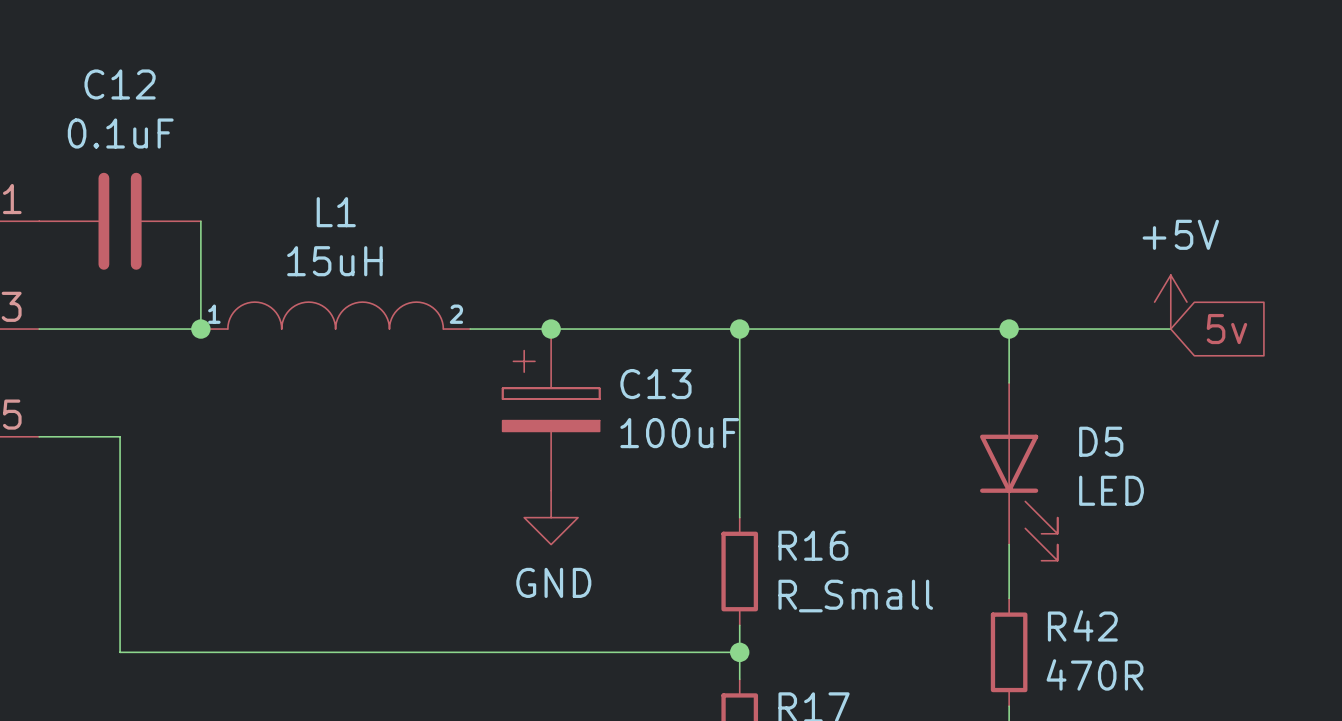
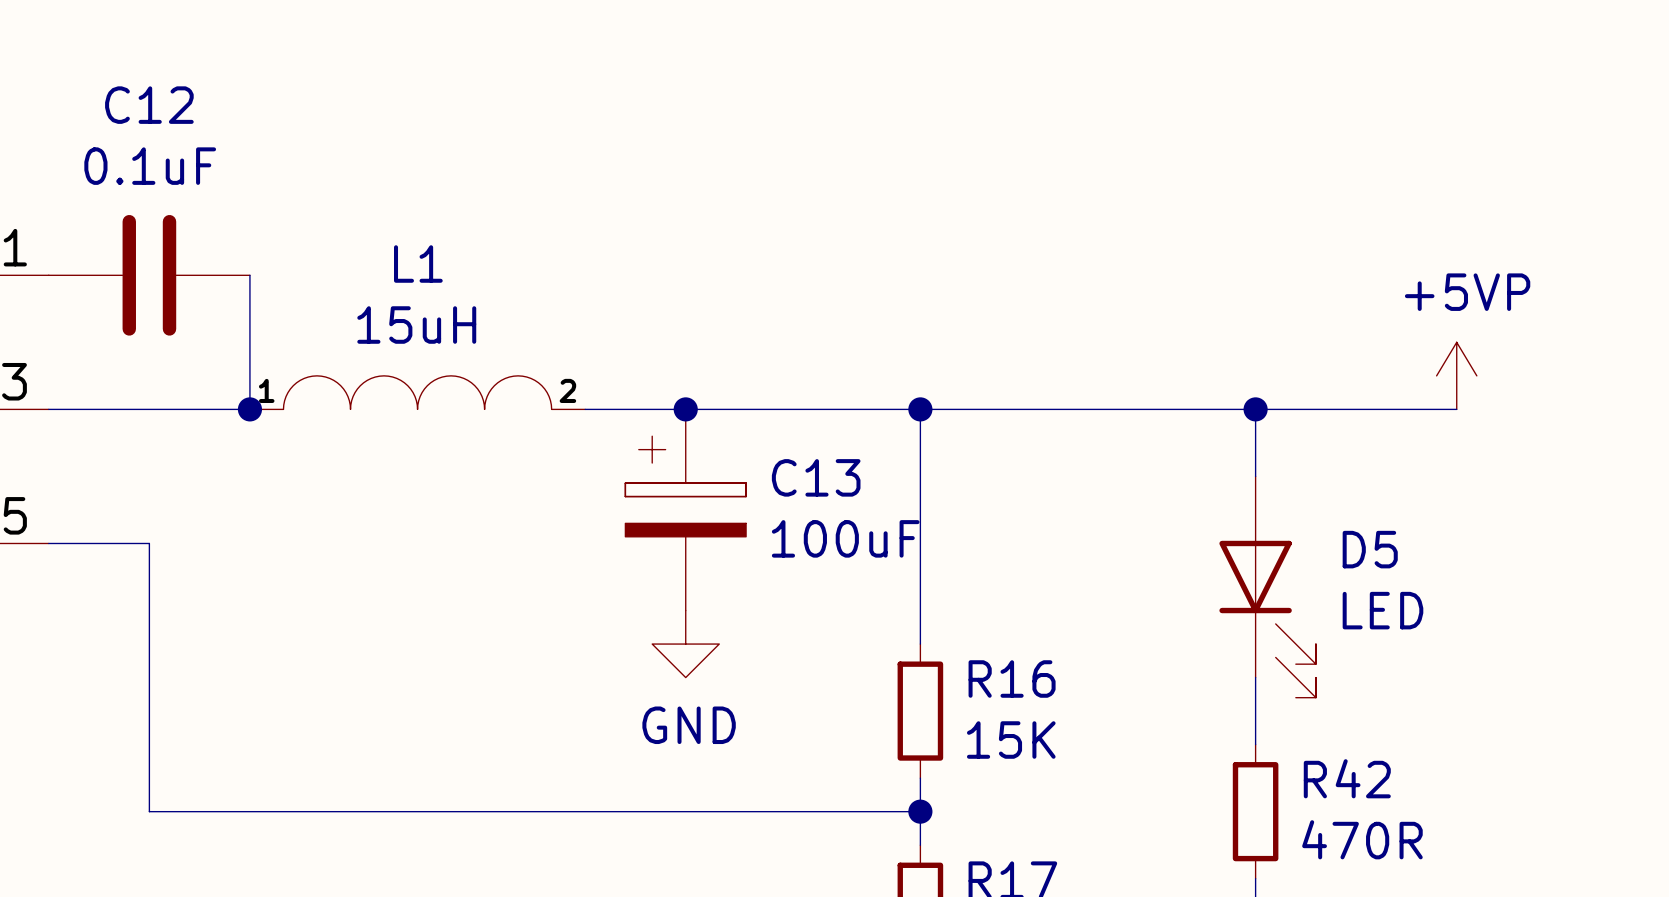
power symbol: +5V (1170, 302) -> +5VP (1456, 375)
global label: 5v (1226, 329) -> none
R16 value: R_Small (855, 596) -> 15K (1011, 740)

